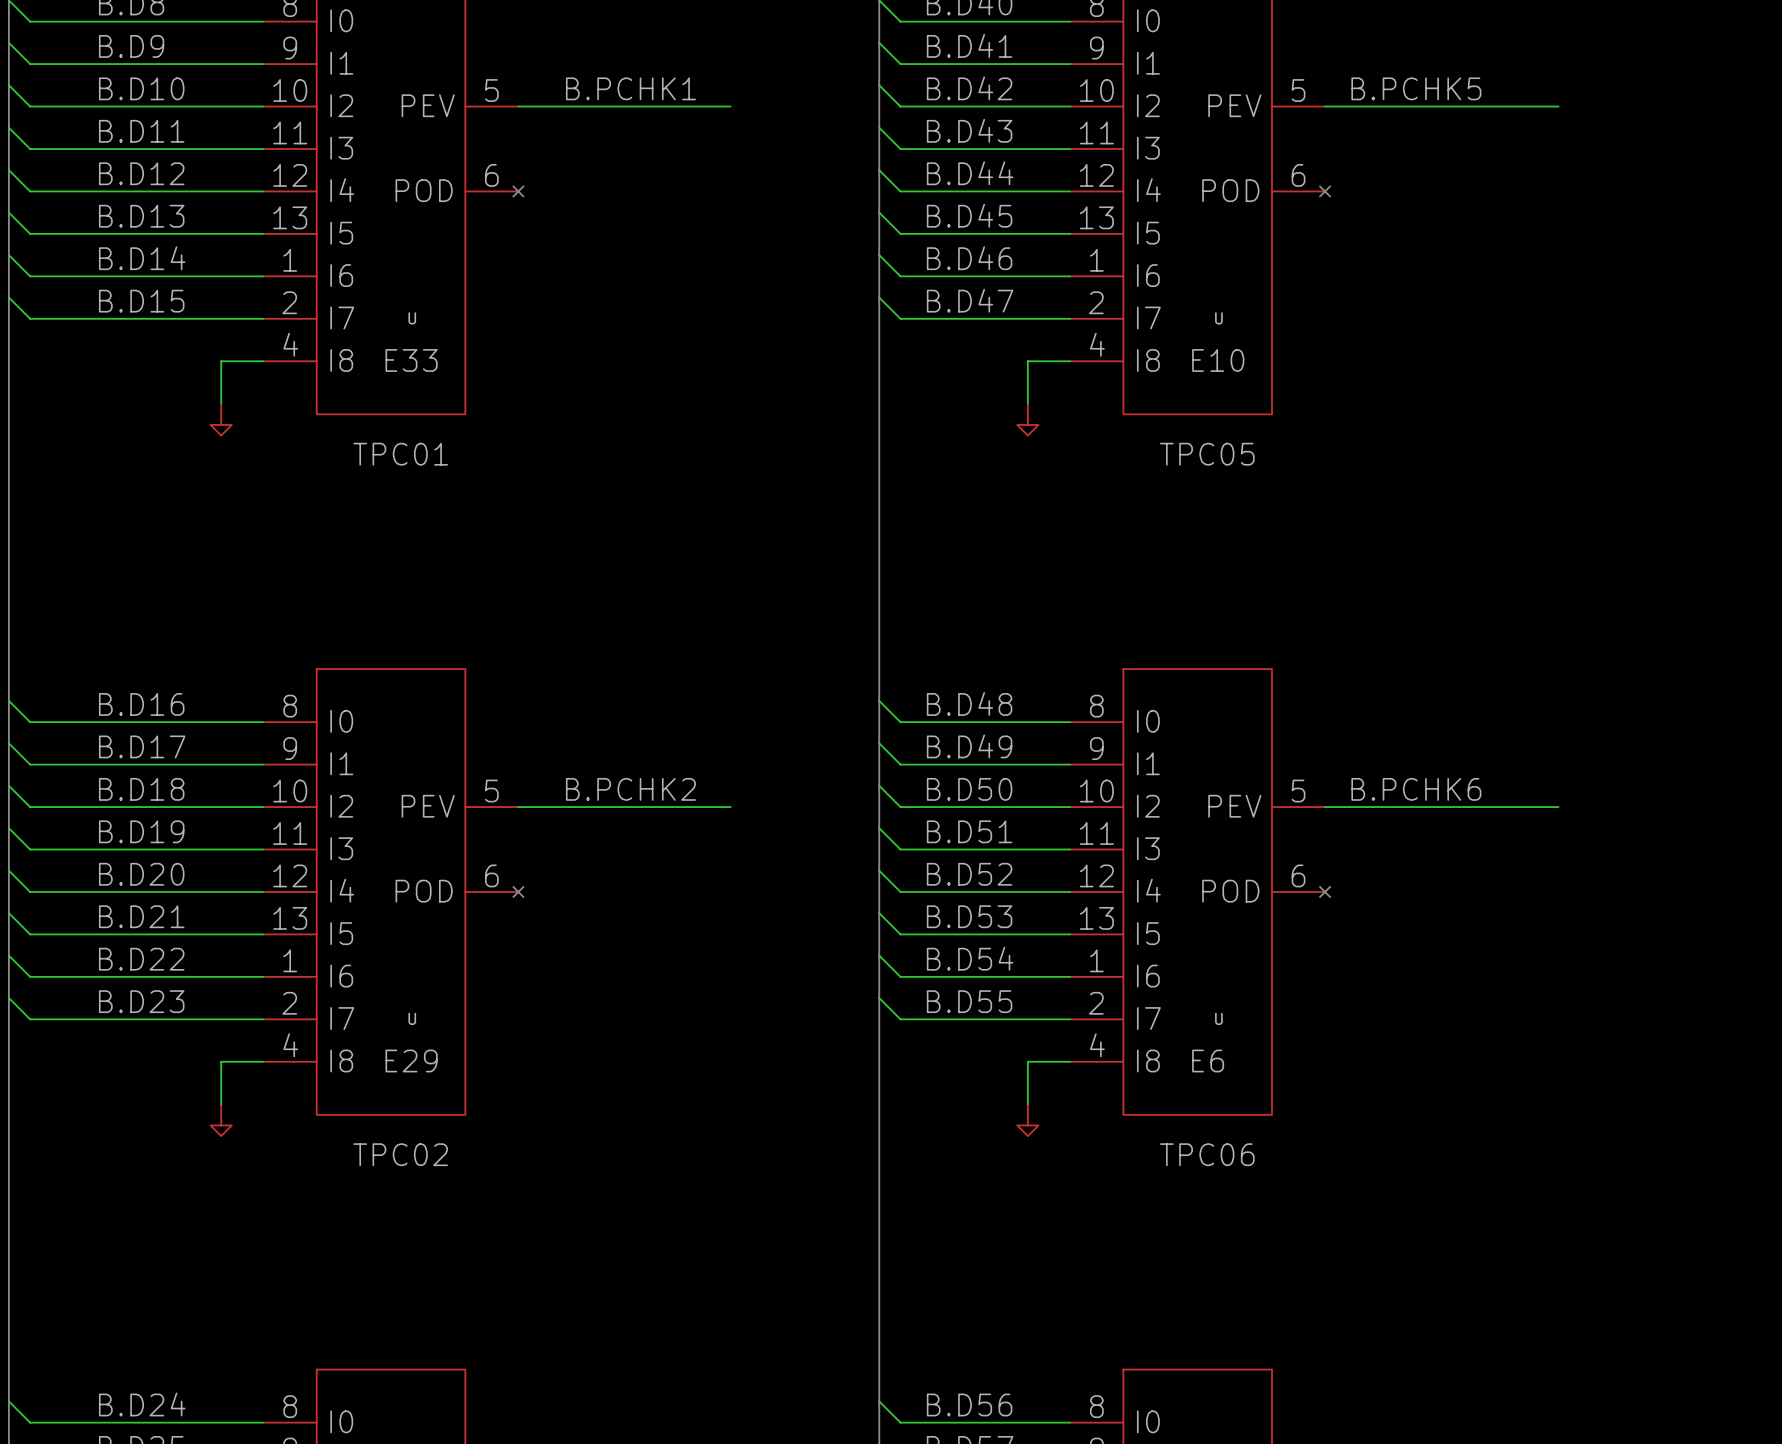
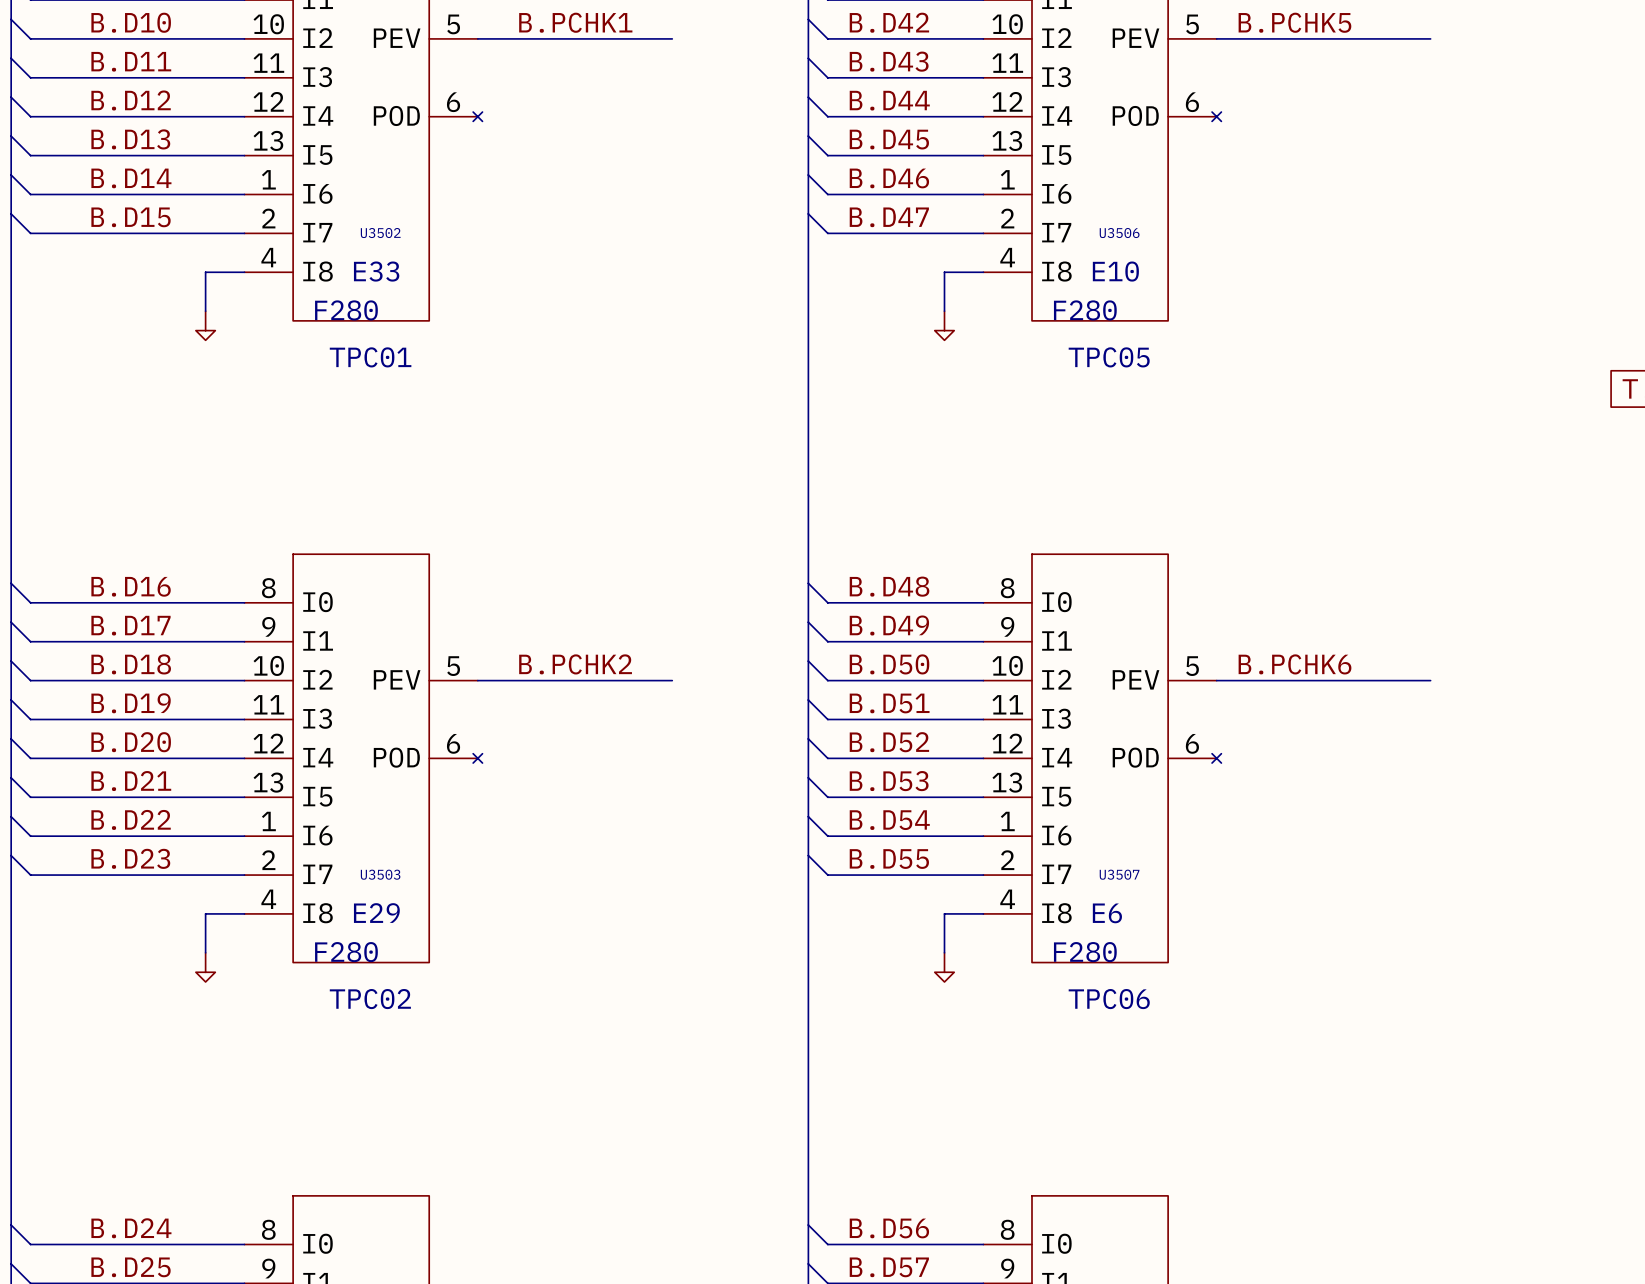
U name: U (412, 318) -> U3502 (380, 233)
U name: U (1218, 318) -> U3506 (1119, 233)
U value: none -> F280 (346, 310)
U value: none -> F280 (1085, 310)
U name: U (412, 1018) -> U3503 (380, 874)
U name: U (1218, 1018) -> U3507 (1119, 874)
U value: none -> F280 (346, 952)
U value: none -> F280 (1085, 952)

